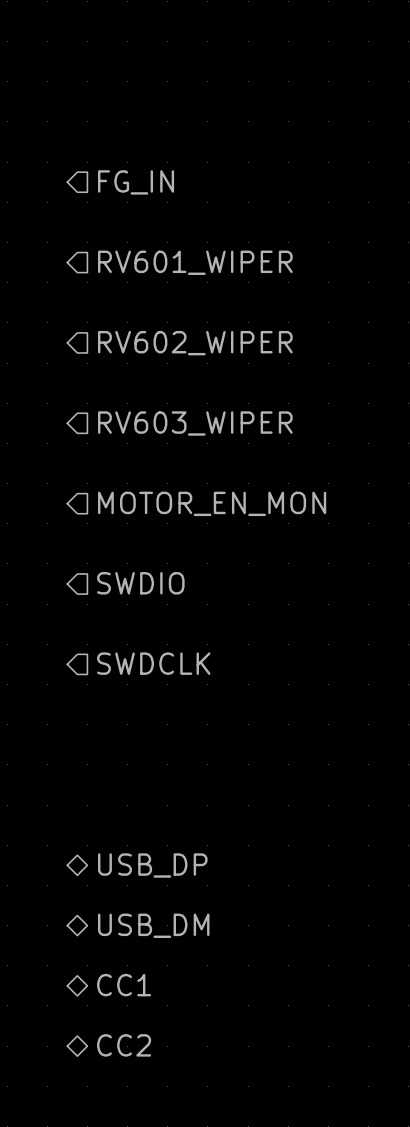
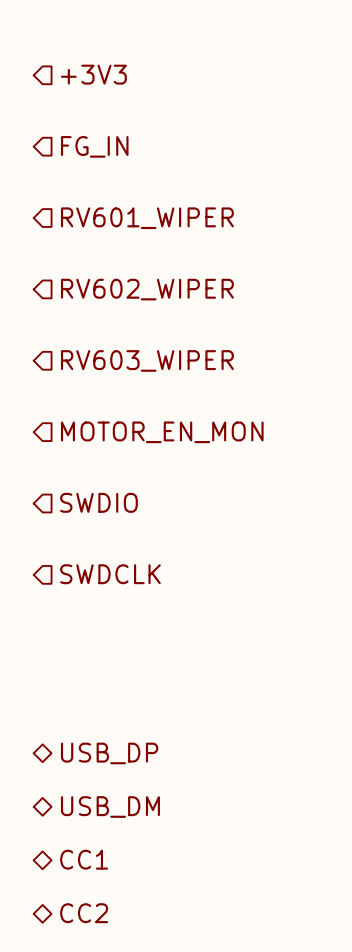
hierarchical label: none -> +3V3 (93, 74)

